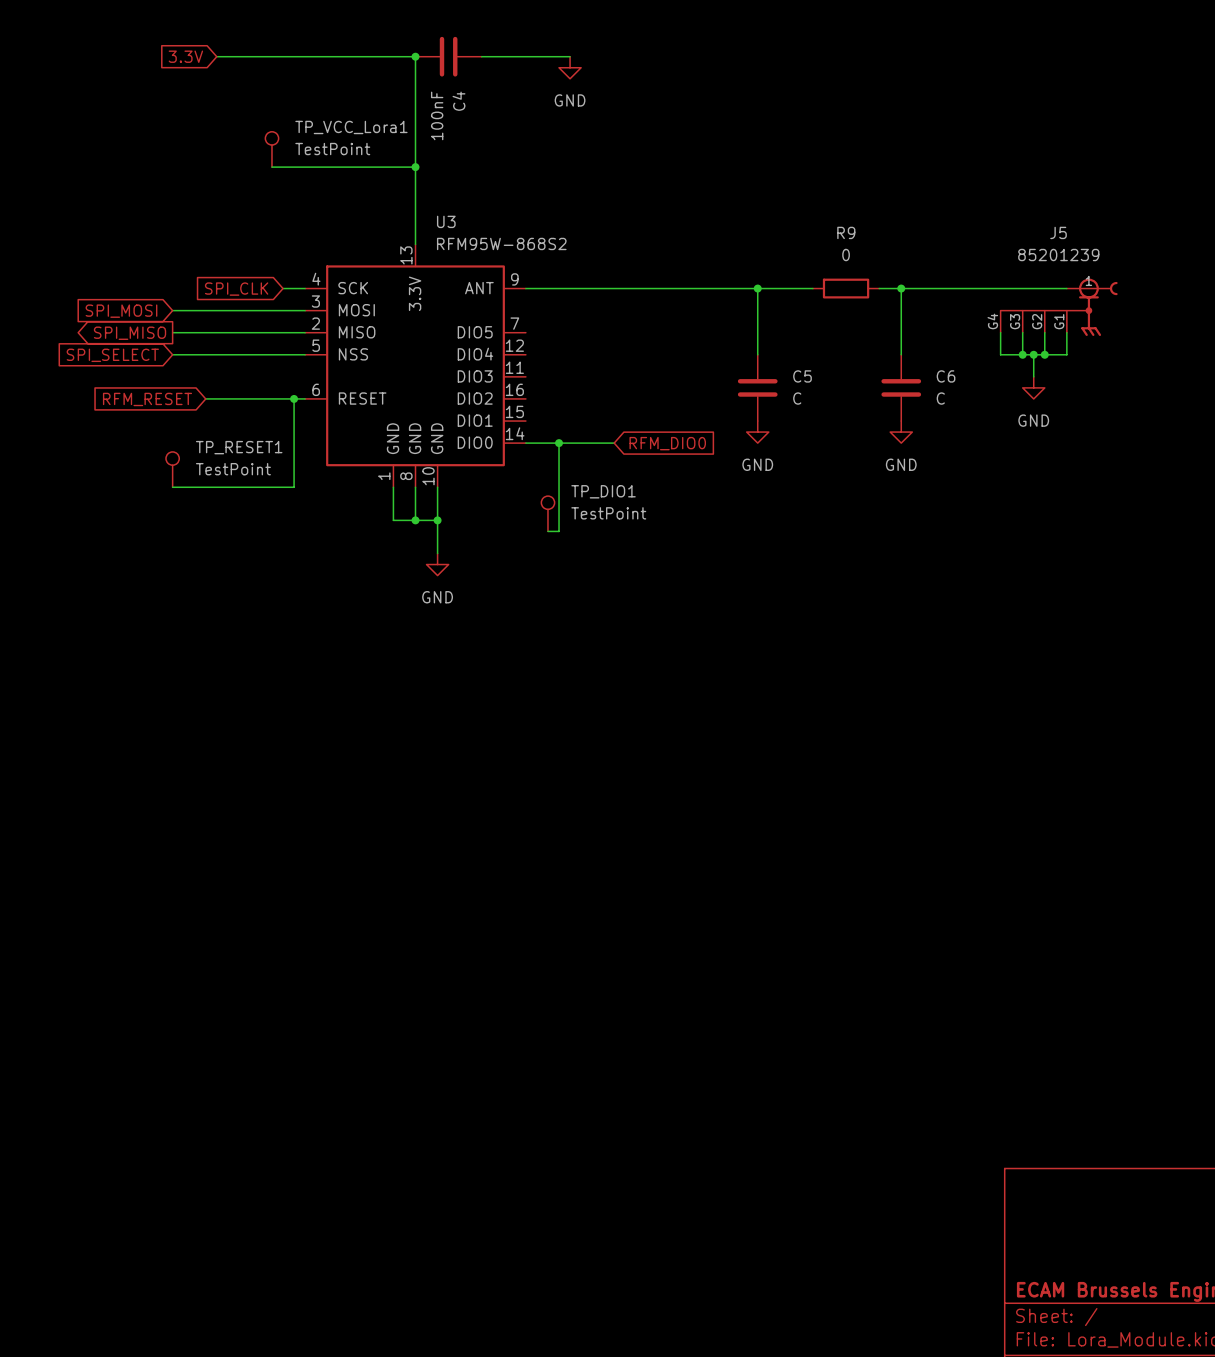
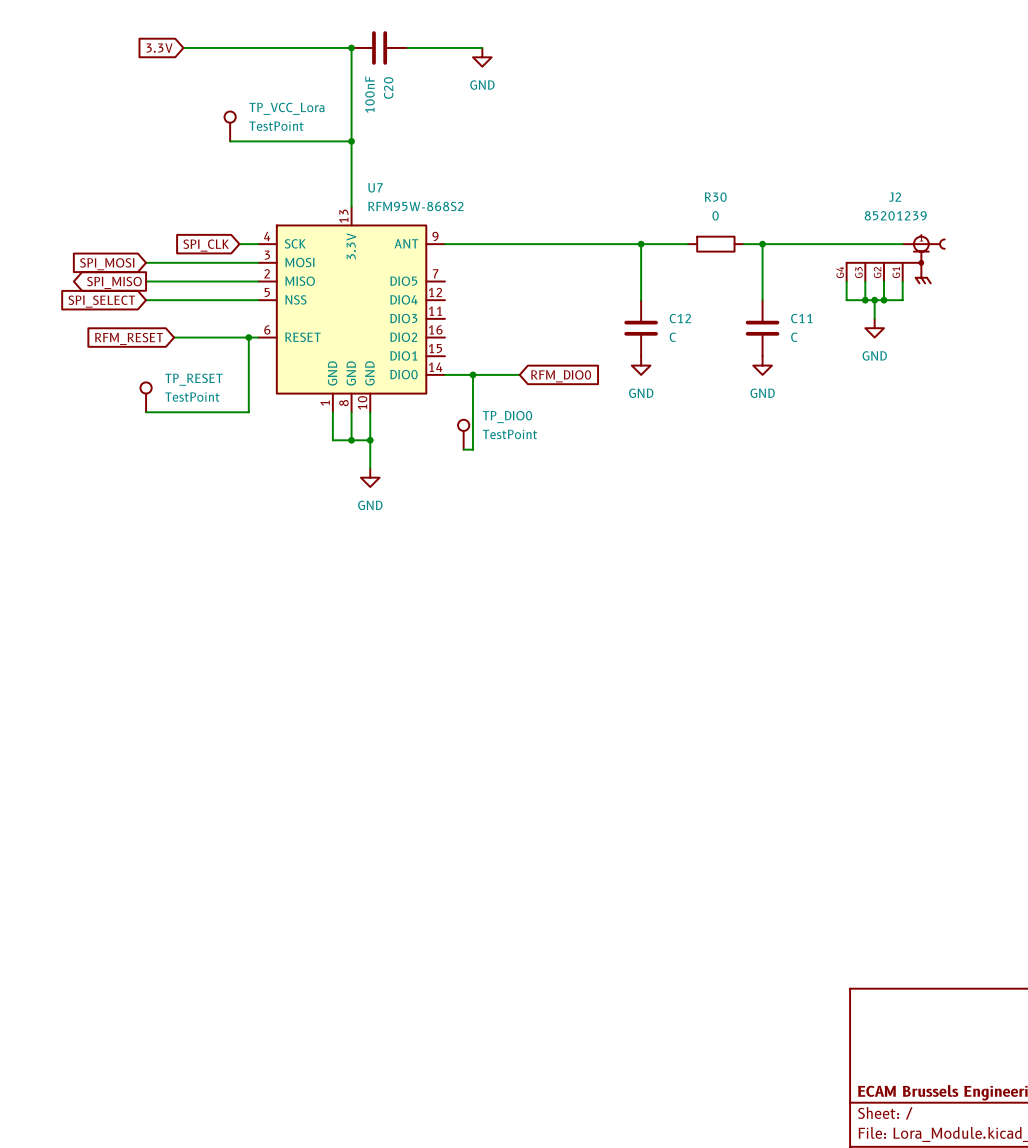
C4 name: C4 (458, 101) -> C20 (388, 87)
TP_VCC_Lora1 name: TP_VCC_Lora1 (351, 127) -> TP_VCC_Lora (286, 108)
U3 name: U3 (446, 221) -> U7 (375, 187)
R9 name: R9 (846, 232) -> R30 (715, 197)
J5 name: J5 (1058, 232) -> J2 (895, 197)
C5 name: C5 (802, 376) -> C12 (680, 318)
C6 name: C6 (946, 376) -> C11 (801, 318)
TP_RESET1 name: TP_RESET1 (239, 447) -> TP_RESET (193, 379)
TP_DIO1 name: TP_DIO1 (603, 491) -> TP_DIO0 (507, 417)

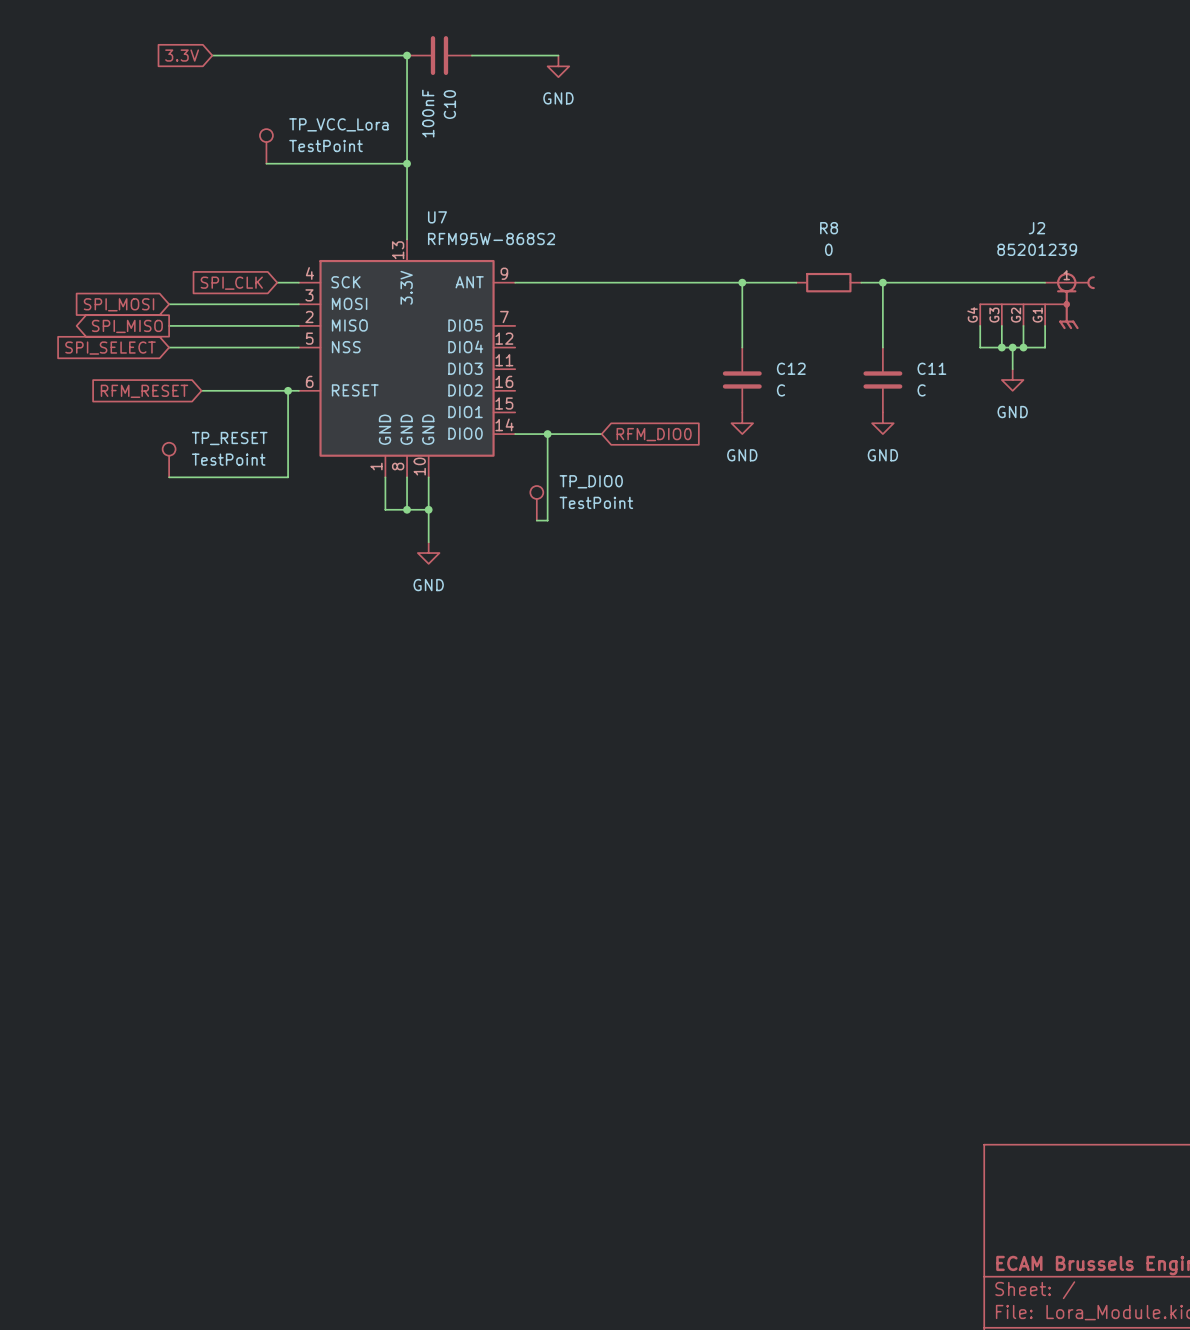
C20 name: C20 (388, 87) -> C10 (449, 104)
R30 name: R30 (715, 197) -> R8 (829, 228)

